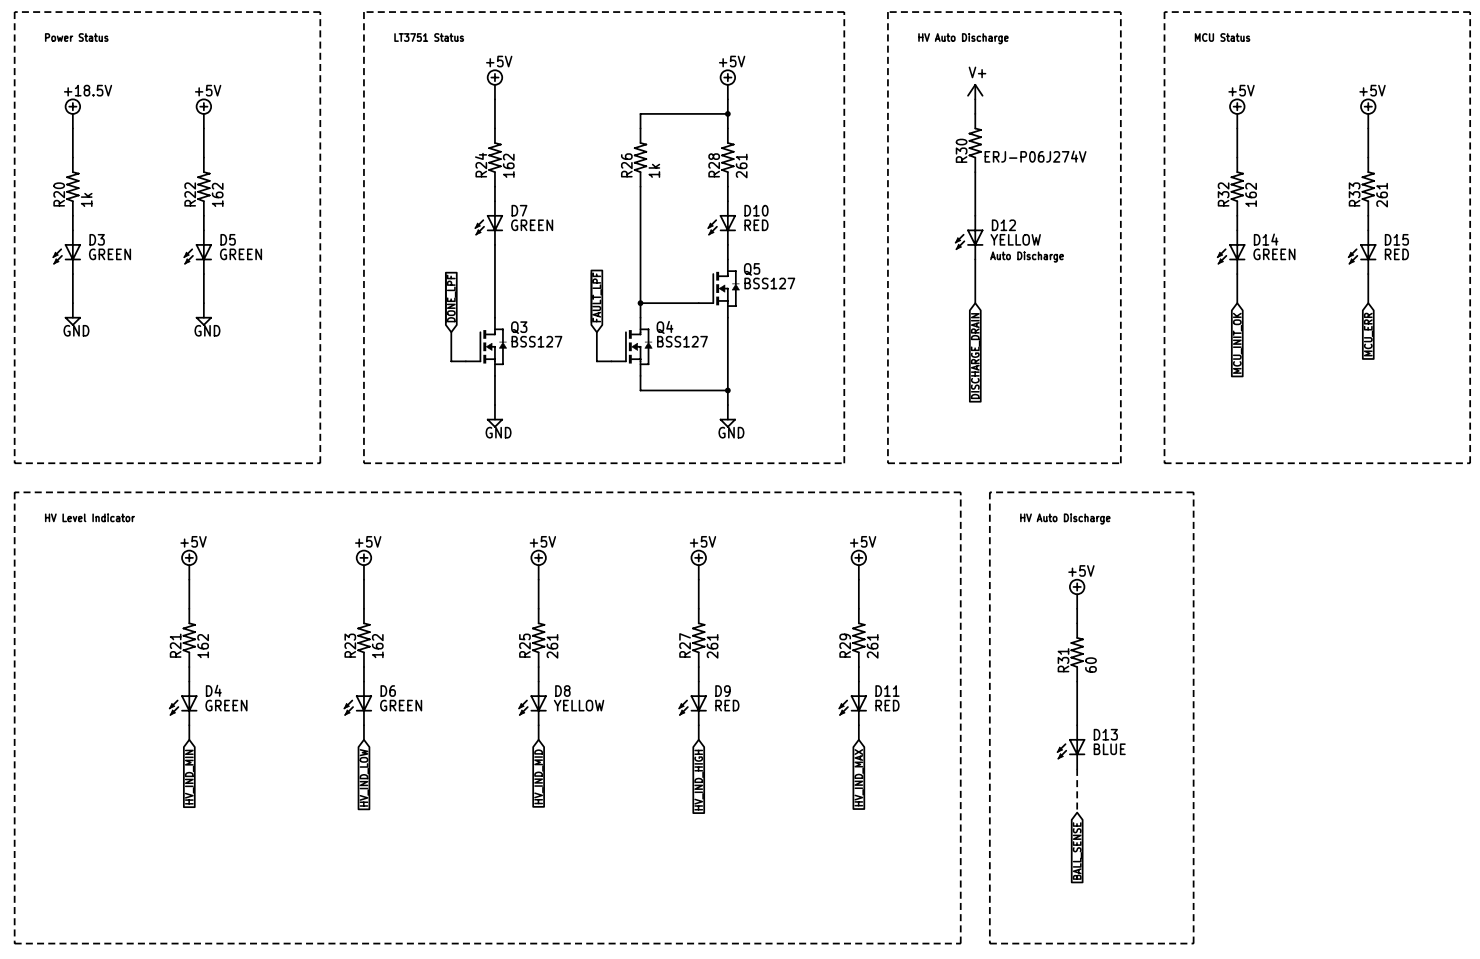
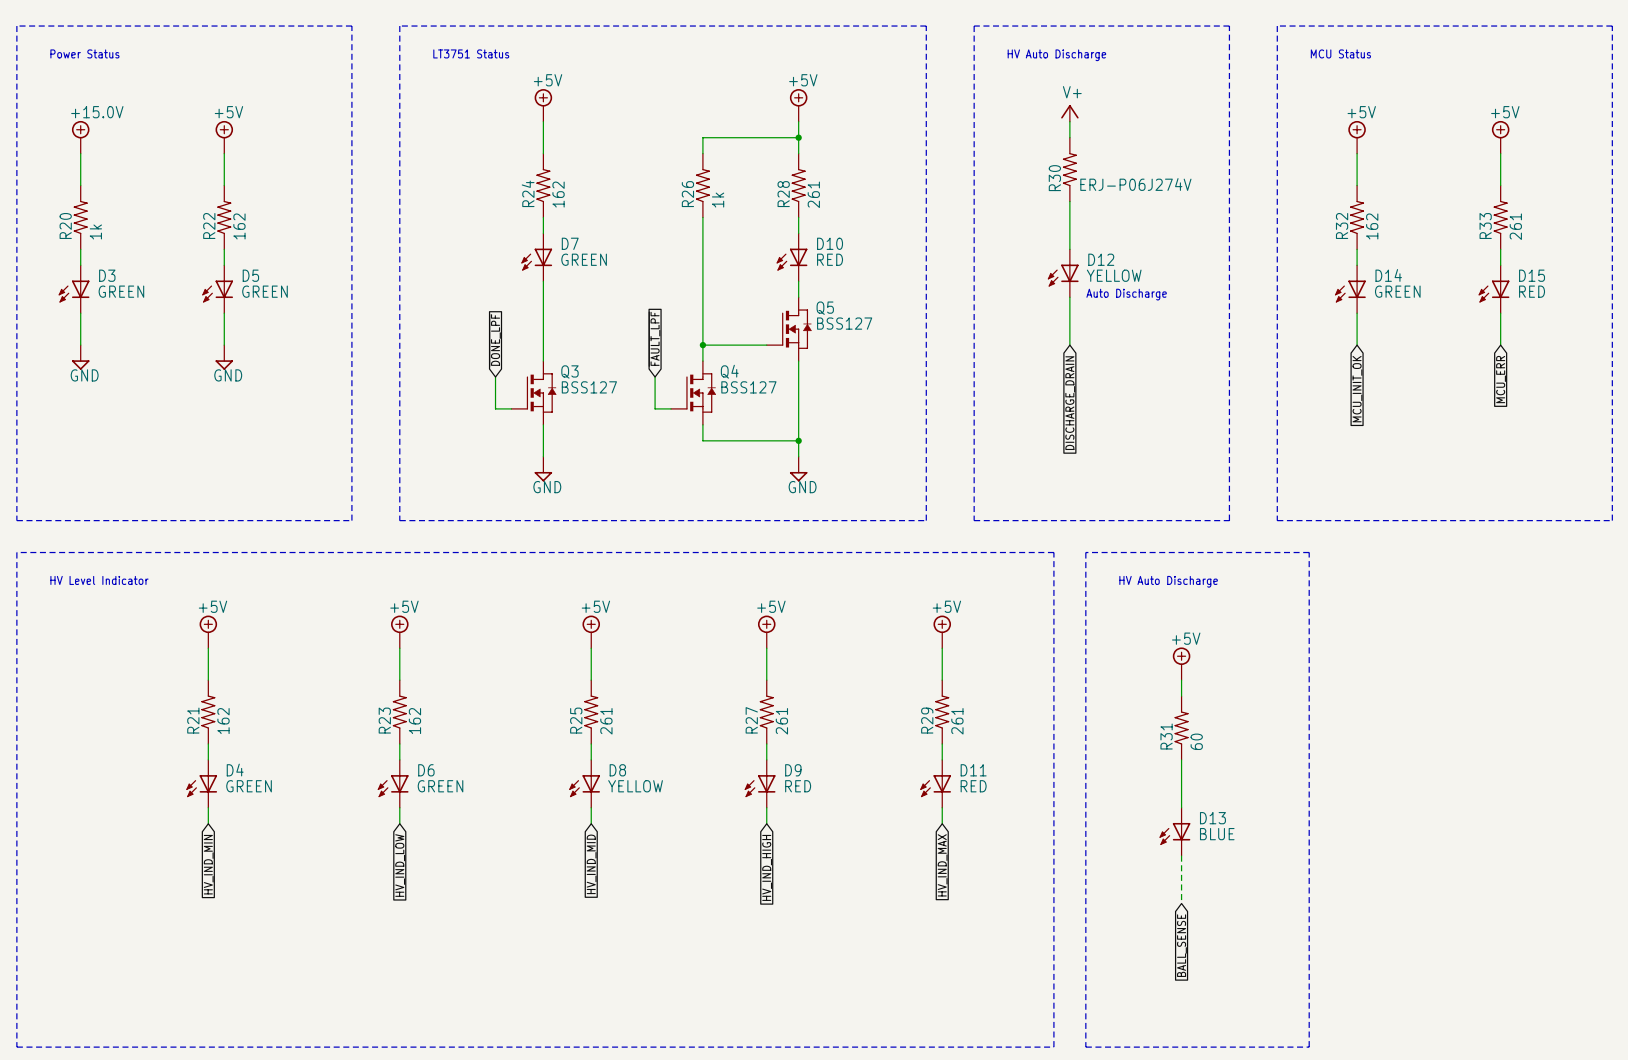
power symbol: +18.5V (72, 113) -> +15.0V (80, 137)

